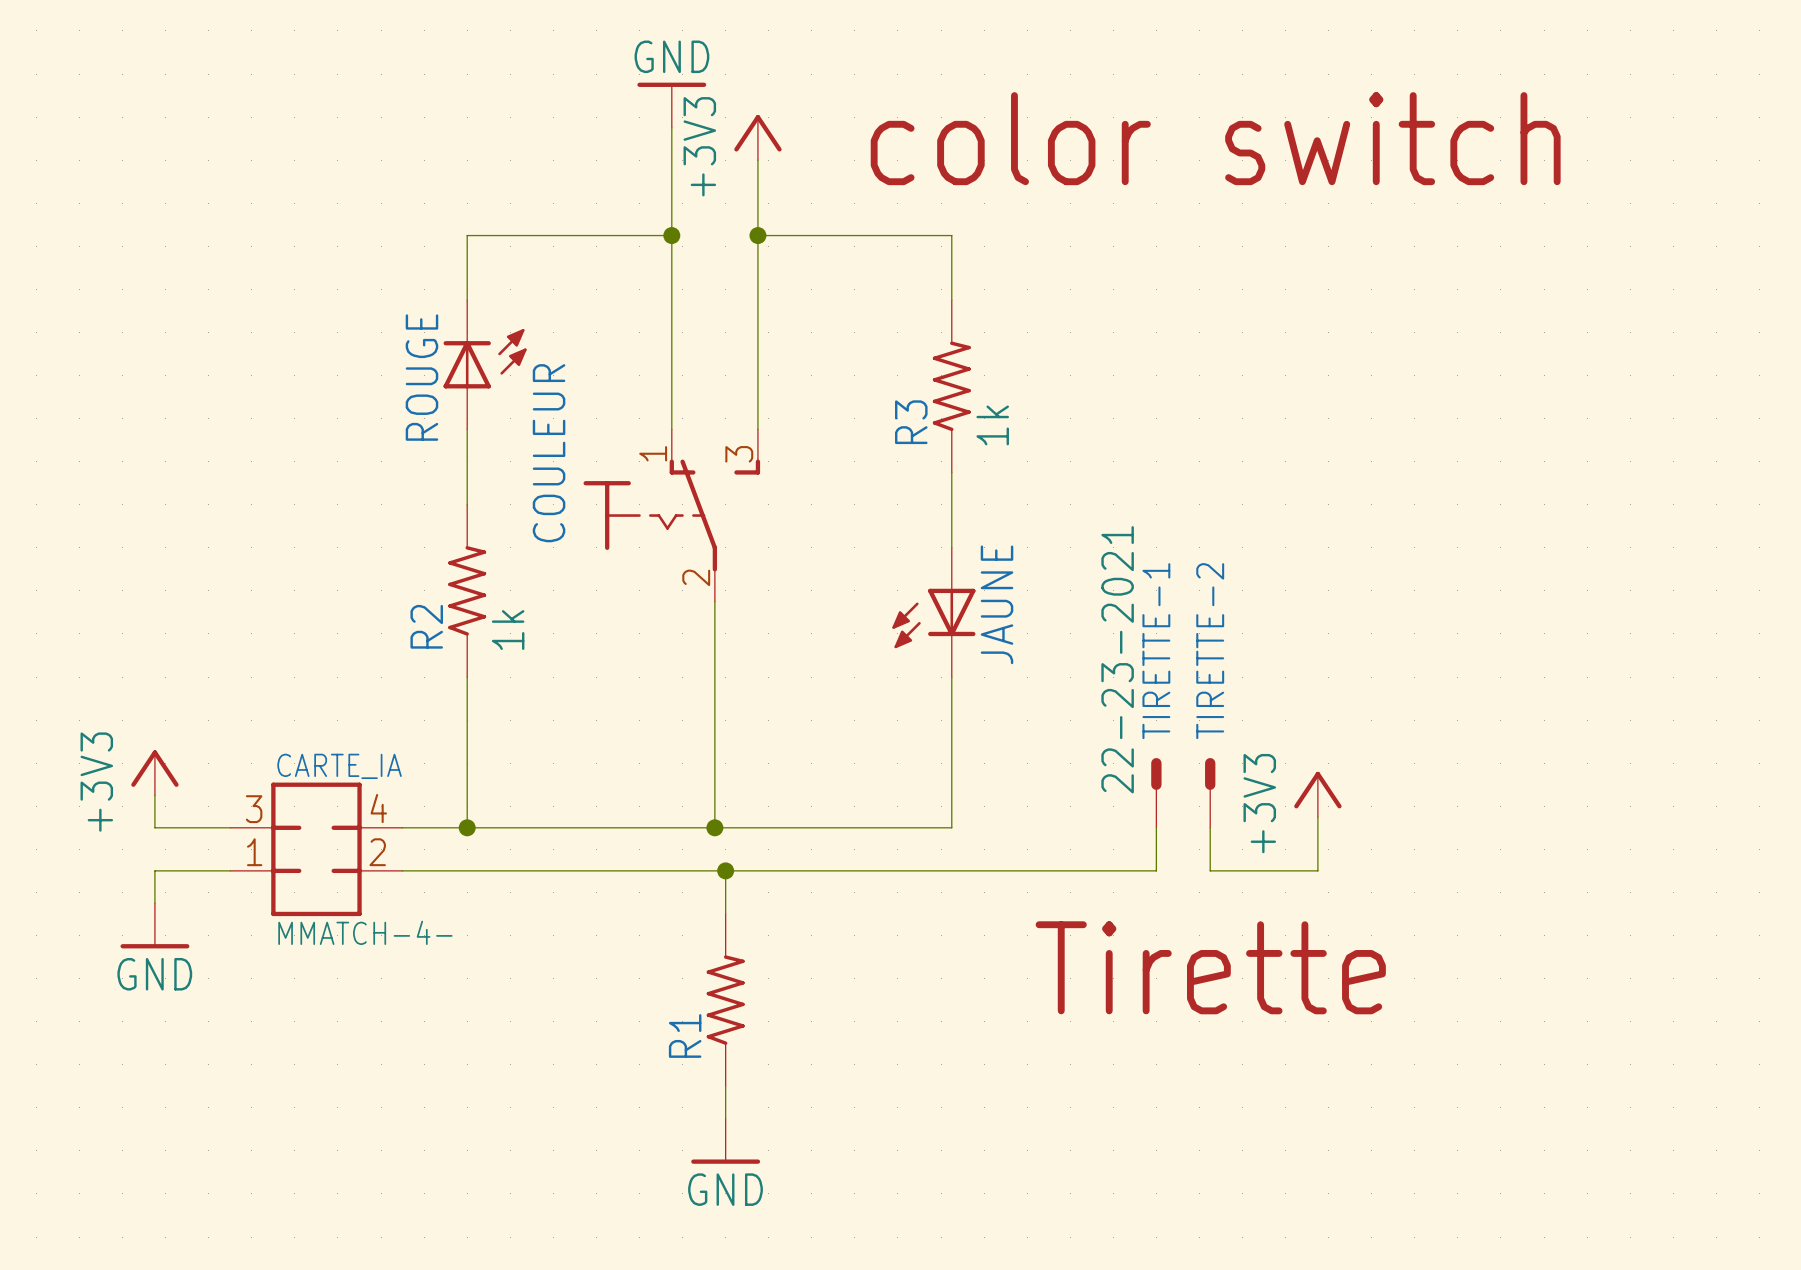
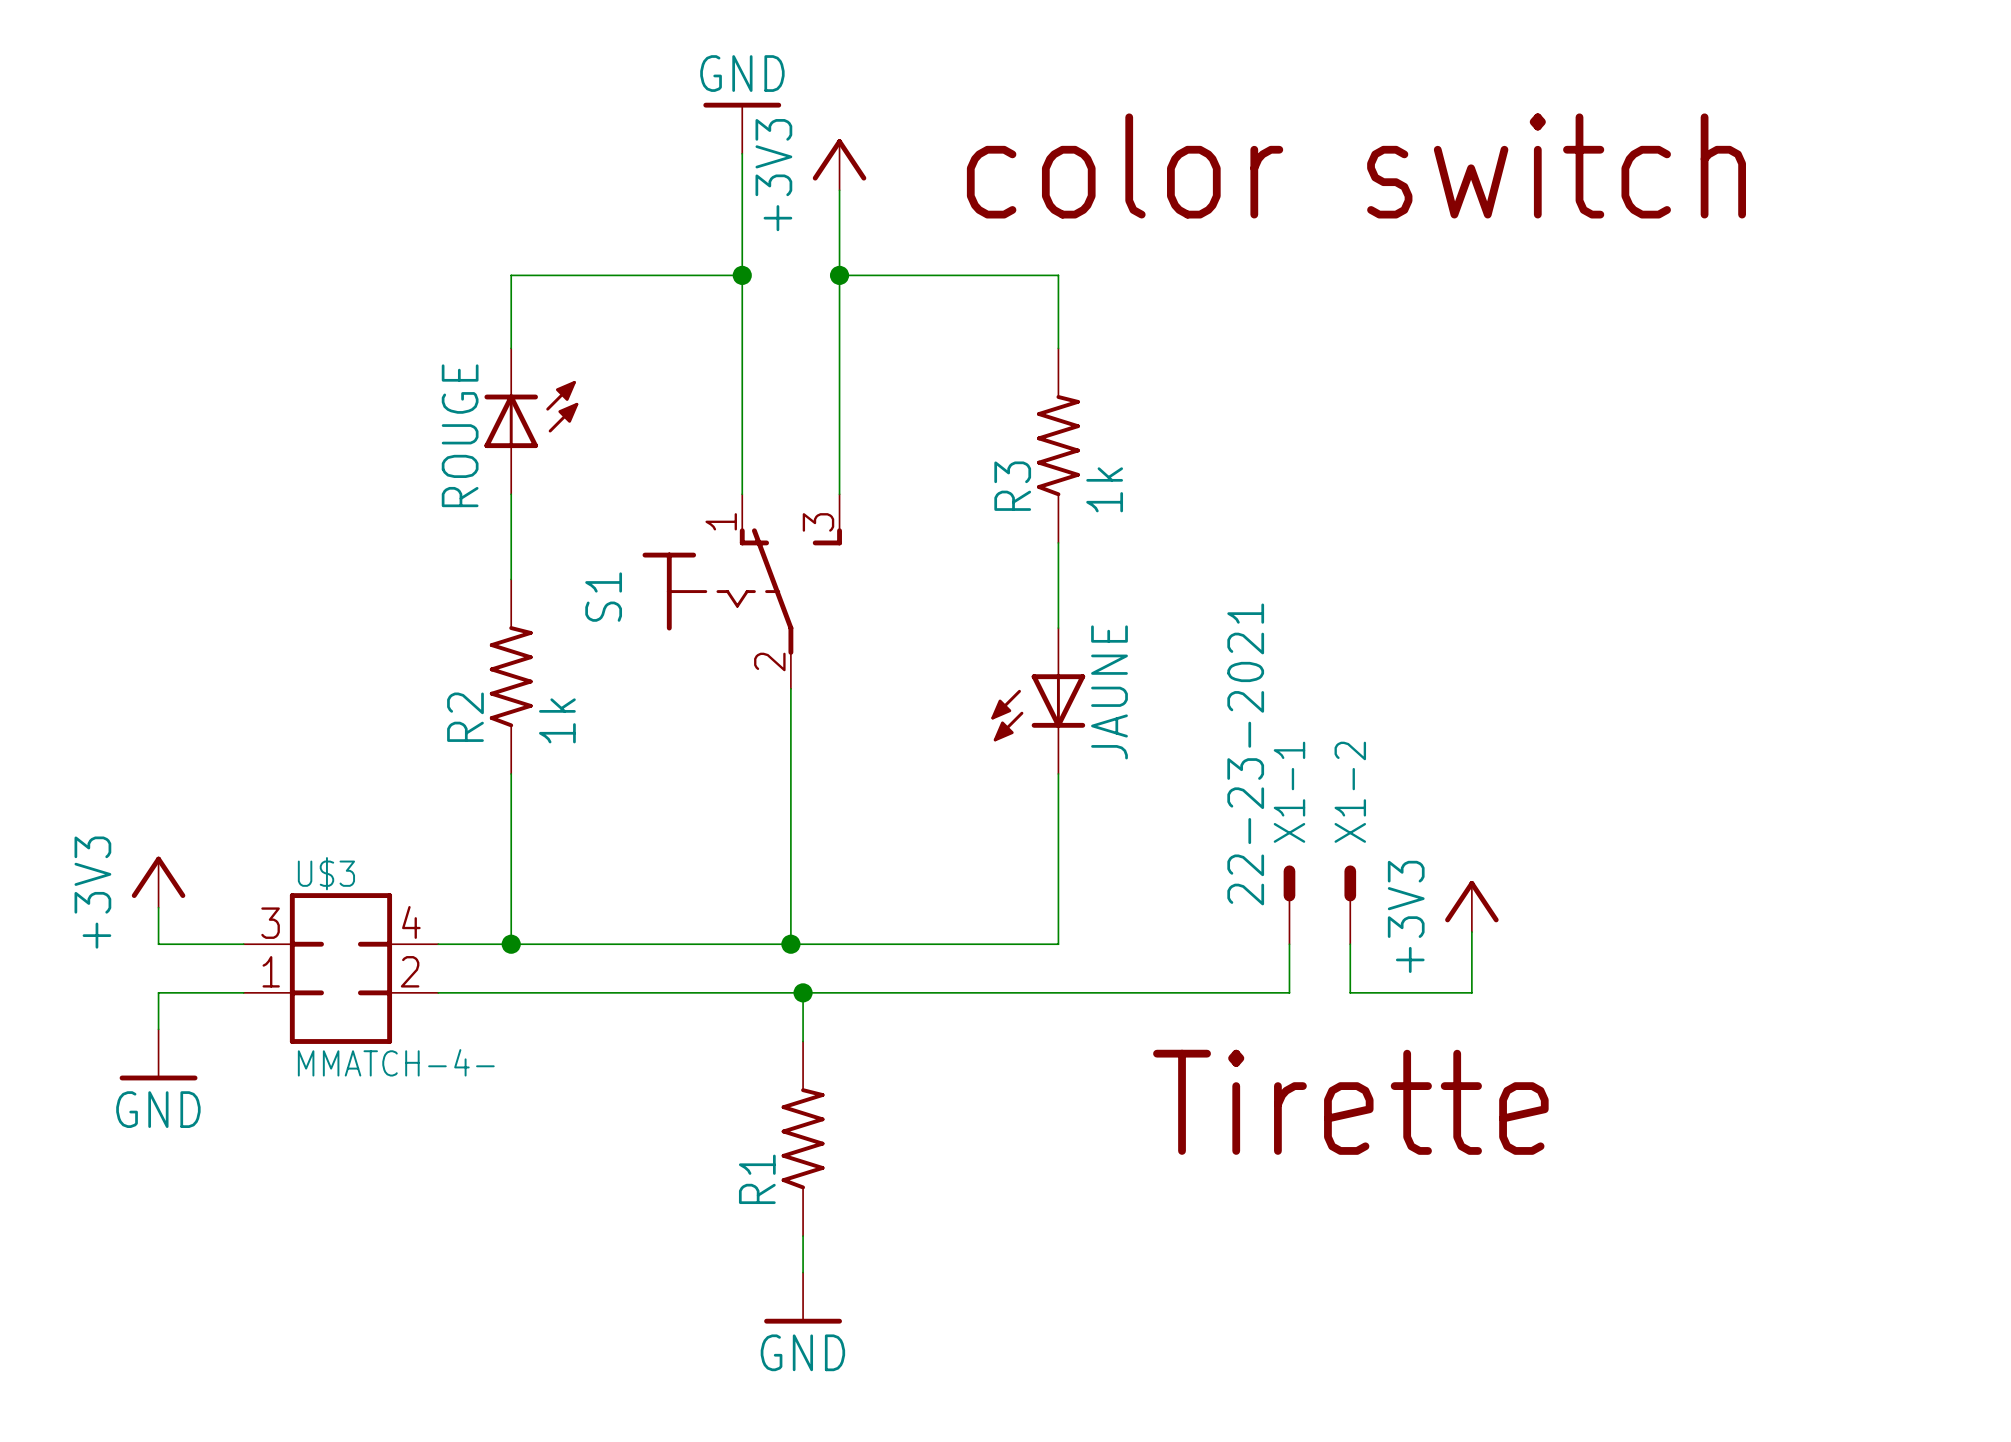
COULEUR name: COULEUR (549, 453) -> S1 (603, 597)
TIRETTE-1 name: TIRETTE-1 (1156, 651) -> X1-1 (1289, 792)
TIRETTE-2 name: TIRETTE-2 (1210, 651) -> X1-2 (1350, 792)
CARTE_IA name: CARTE_IA (339, 766) -> U$3 (326, 873)

